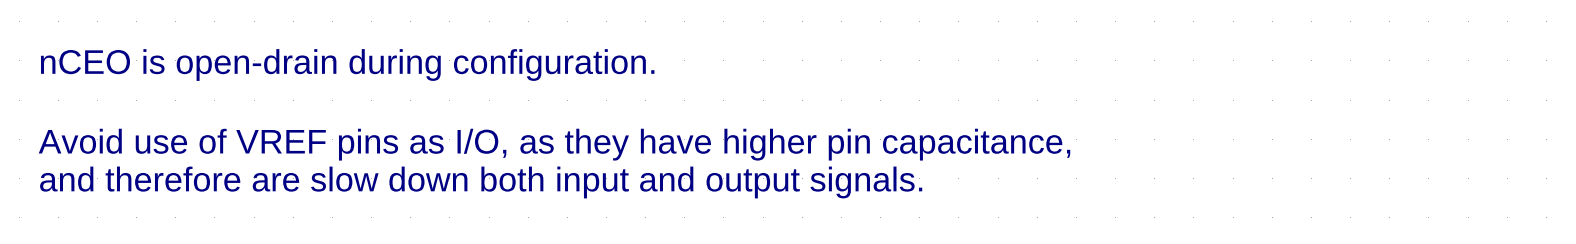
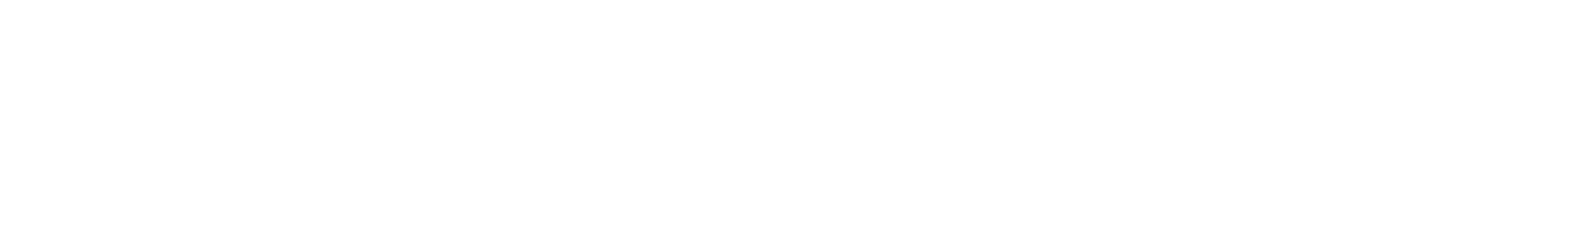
text: nCEO is open-drain during configuration. (347, 65) -> none
text: Avoid use of VREF pins as I/O, as they have higher pin capacitance, (554, 144) -> none
text: and therefore are slow down both input and output signals. (481, 182) -> none

